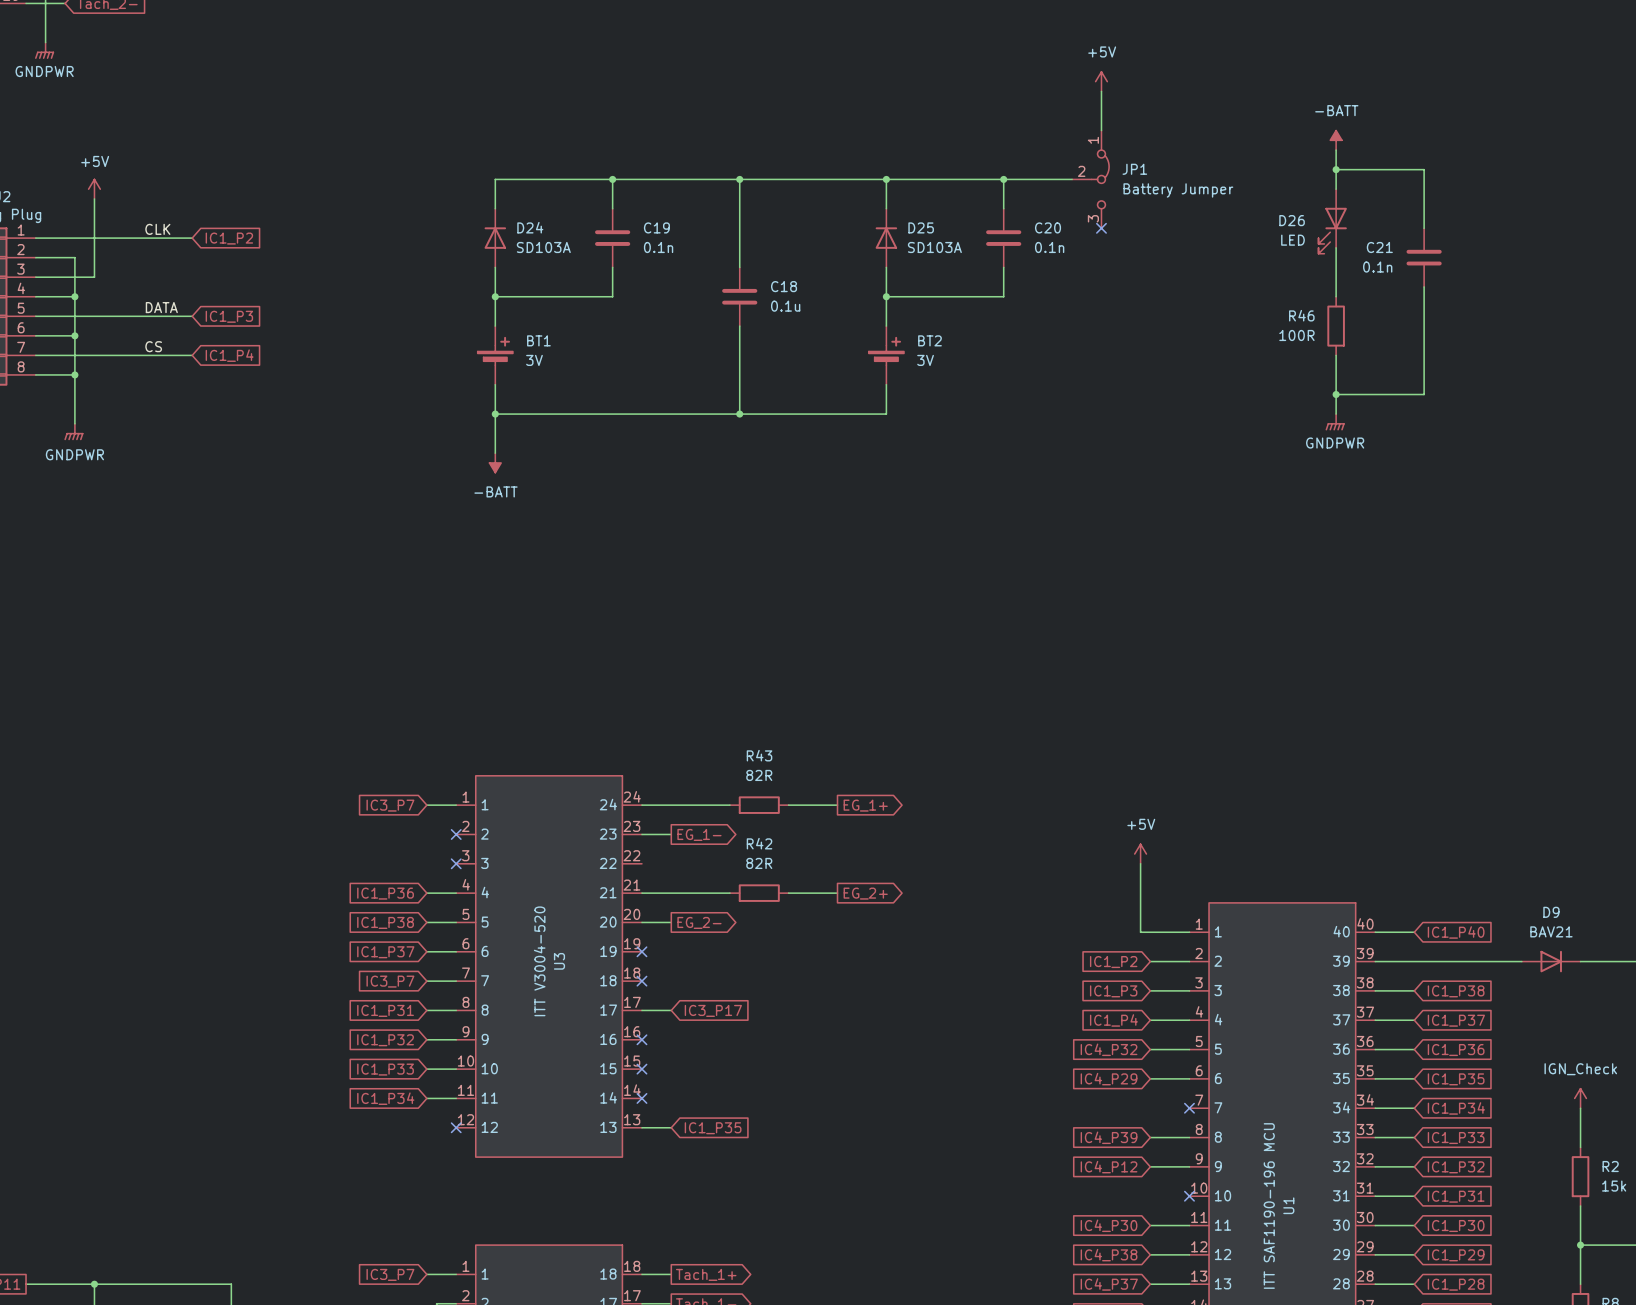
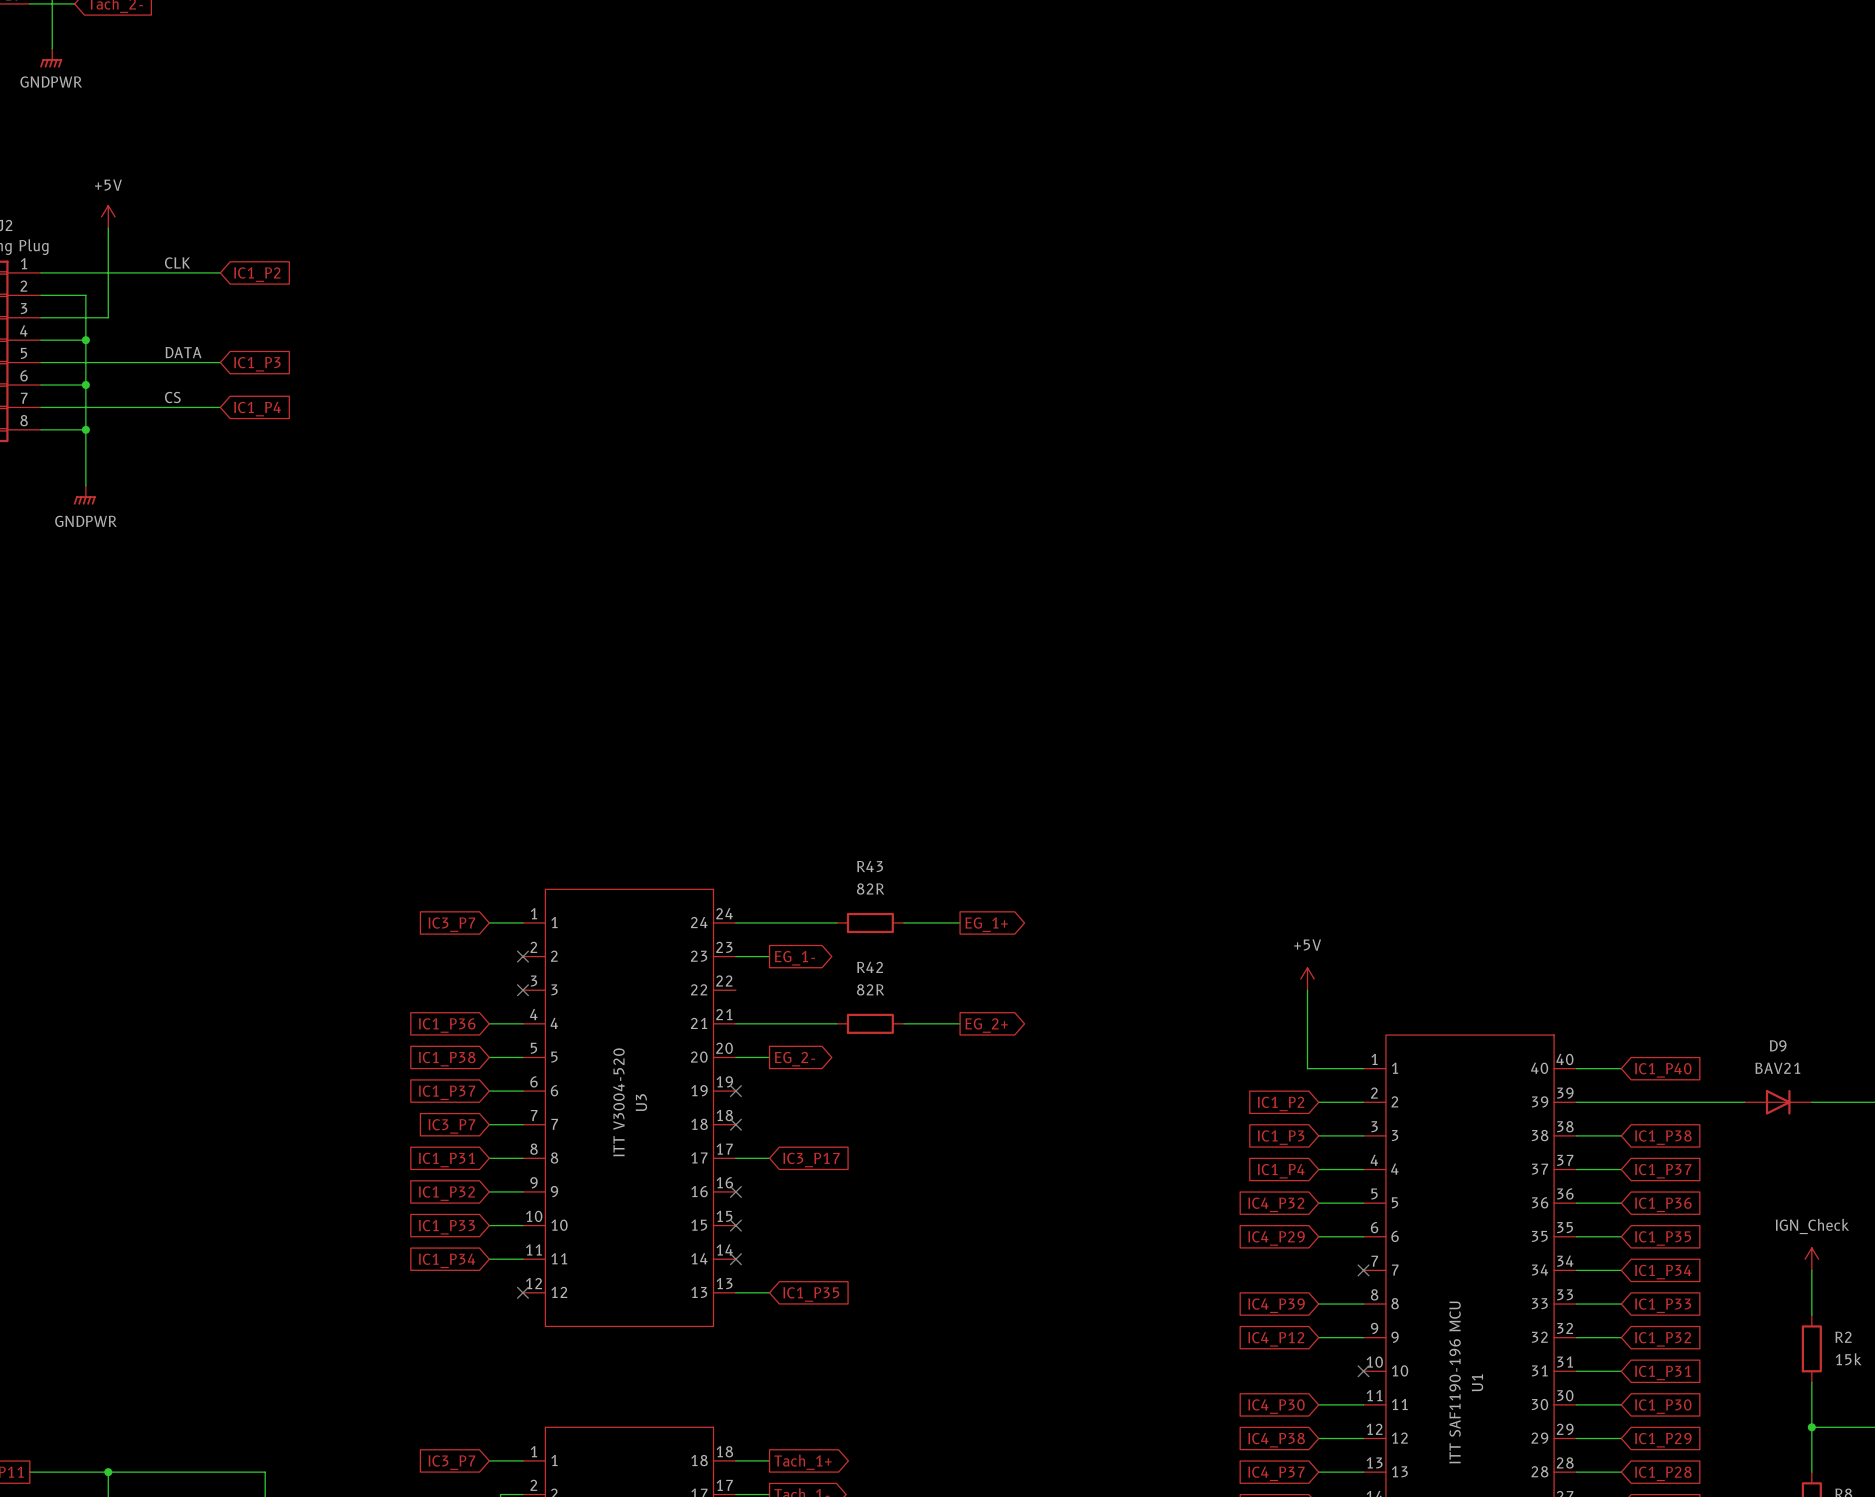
power symbol: +5V (1101, 81) -> none
wire: (1101, 91) (1101, 130) -> none
power symbol: -BATT (1336, 140) -> none
wire: (1336, 150) (1336, 189) -> none
wire: (1336, 169) (1424, 169) (1424, 228) -> none
junction: (1336, 169) -> none
wire: (612, 179) (612, 208) -> none
junction: (612, 179) -> none
wire: (739, 179) (739, 267) -> none
junction: (739, 179) -> none
wire: (886, 179) (886, 208) -> none
junction: (886, 179) -> none
wire: (1003, 179) (1003, 208) -> none
junction: (1003, 179) -> none
wire: (1072, 179) (495, 179) (495, 208) -> none
JP1: Battery Jumper (1090, 179) -> none
D26: LED (1332, 221) -> none
no-connect mark: (1101, 228) -> none
D24: SD103A (495, 238) -> none
C19: 0.1n (612, 238) -> none
D25: SD103A (886, 238) -> none
C20: 0.1n (1003, 238) -> none
wire: (1336, 247) (1336, 296) -> none
C21: 0.1n (1424, 257) -> none
wire: (495, 267) (495, 326) -> none
wire: (612, 267) (612, 296) (495, 296) -> none
wire: (886, 267) (886, 326) -> none
wire: (1003, 267) (1003, 296) (886, 296) -> none
wire: (1424, 286) (1424, 394) (1336, 394) -> none
junction: (495, 296) -> none
C18: 0.1u (739, 296) -> none
junction: (886, 296) -> none
wire: (739, 326) (739, 414) -> none
R46: 100R (1336, 326) -> none
BT1: 3V (495, 355) -> none
BT2: 3V (886, 355) -> none
wire: (1336, 355) (1336, 414) -> none
wire: (495, 384) (495, 453) -> none
wire: (886, 384) (886, 414) (495, 414) -> none
junction: (1336, 394) -> none
junction: (495, 414) -> none
junction: (739, 414) -> none
power symbol: GNDPWR (1335, 422) -> none
power symbol: -BATT (495, 462) -> none

